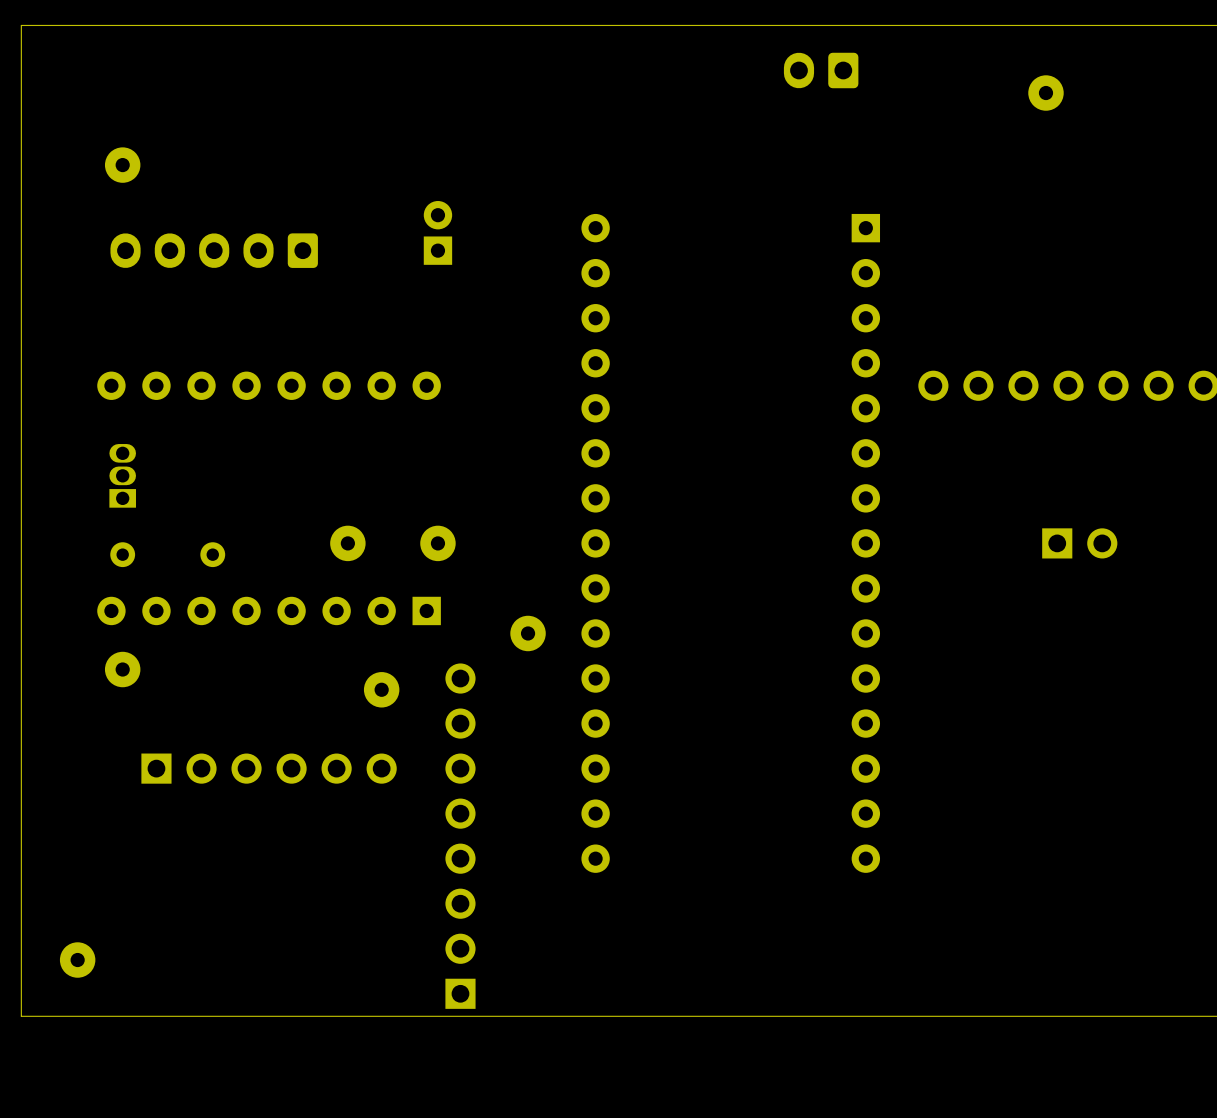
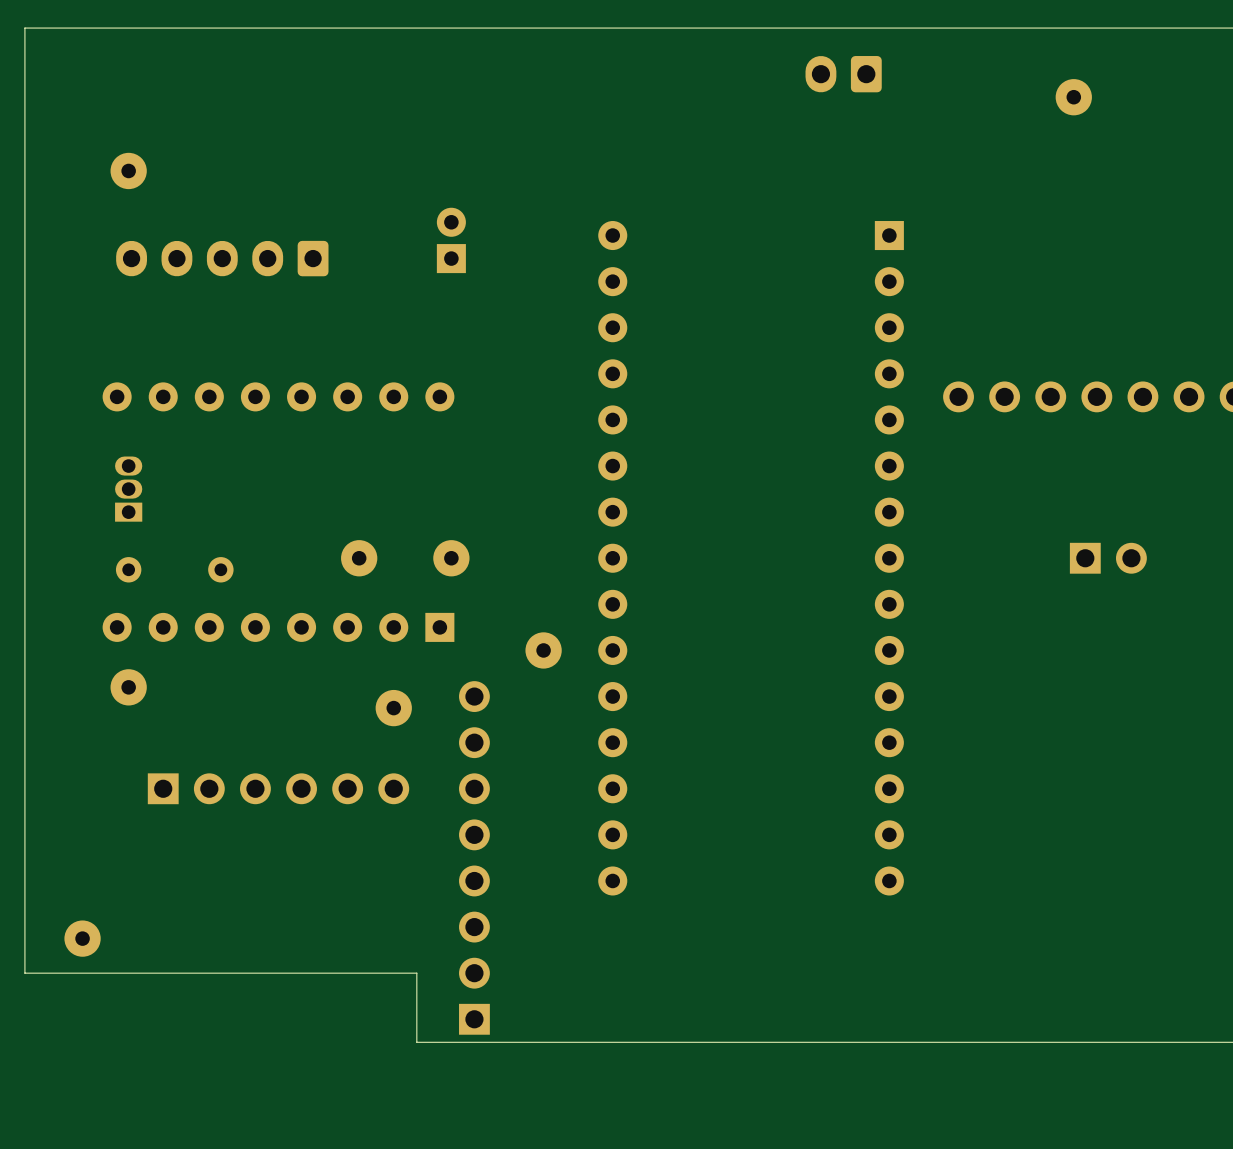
board edge: (21, 948) (21, 1016) (404, 1016) -> (24, 973) (416, 973) (416, 1042)
part position: (77, 960) -> (82, 938)

